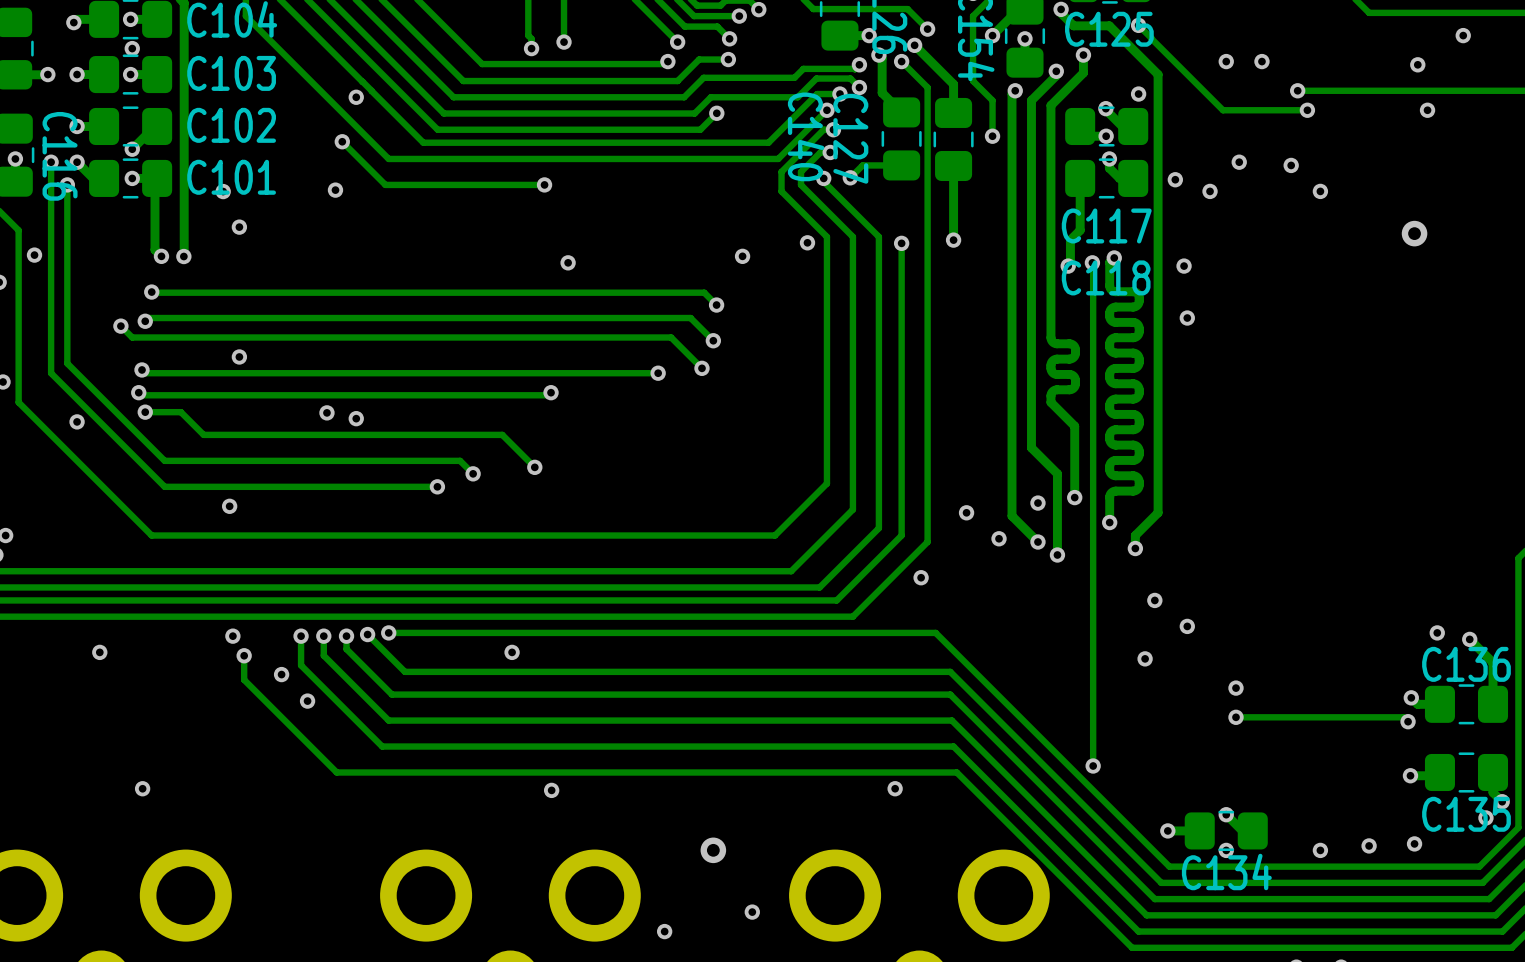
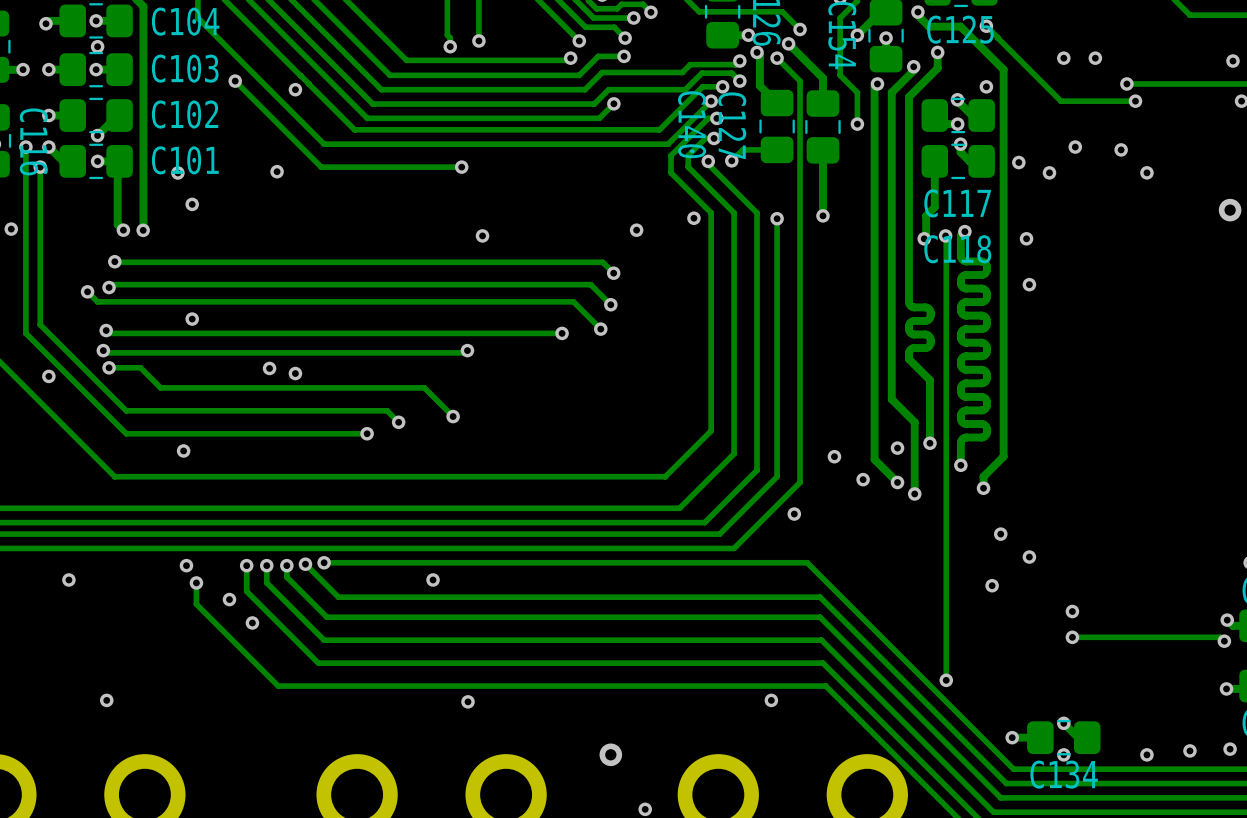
track: none -> (235, 81) (283, 128)
via position: (342, 141) -> (235, 81)

